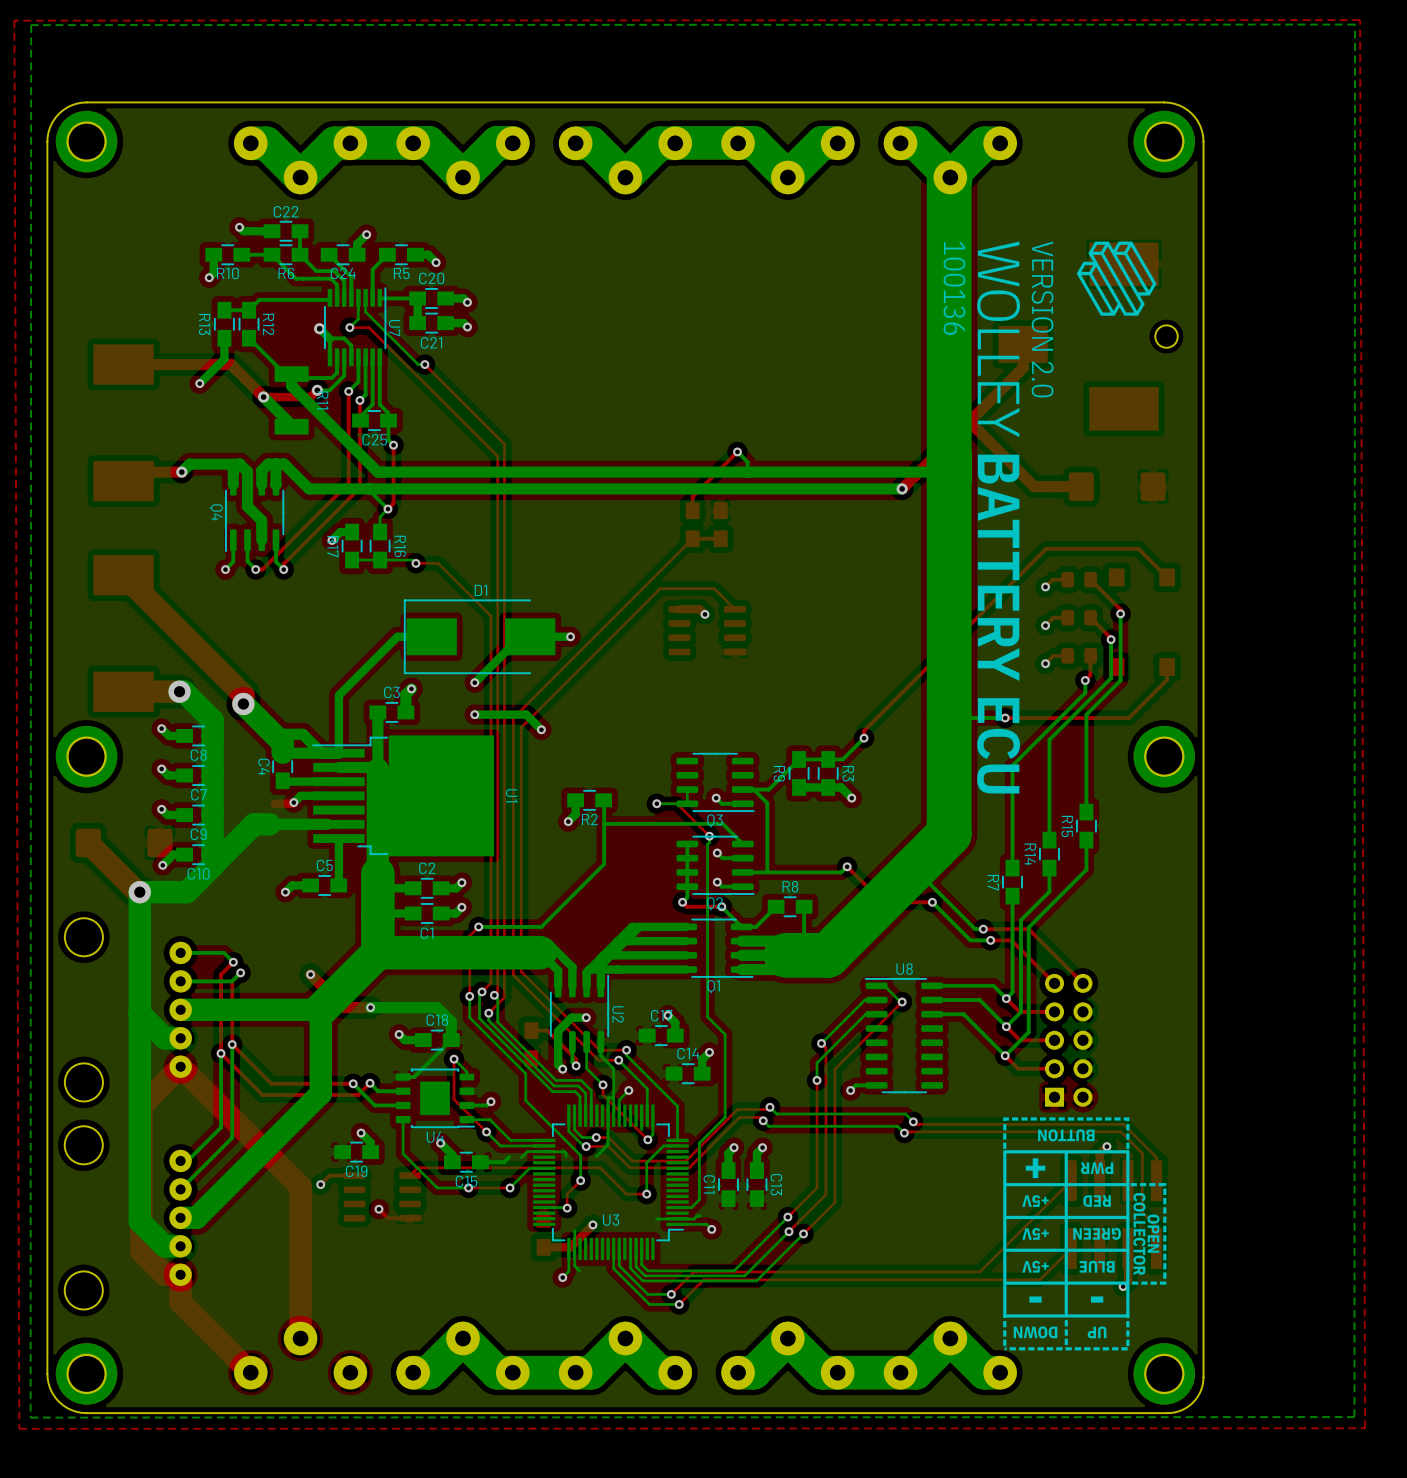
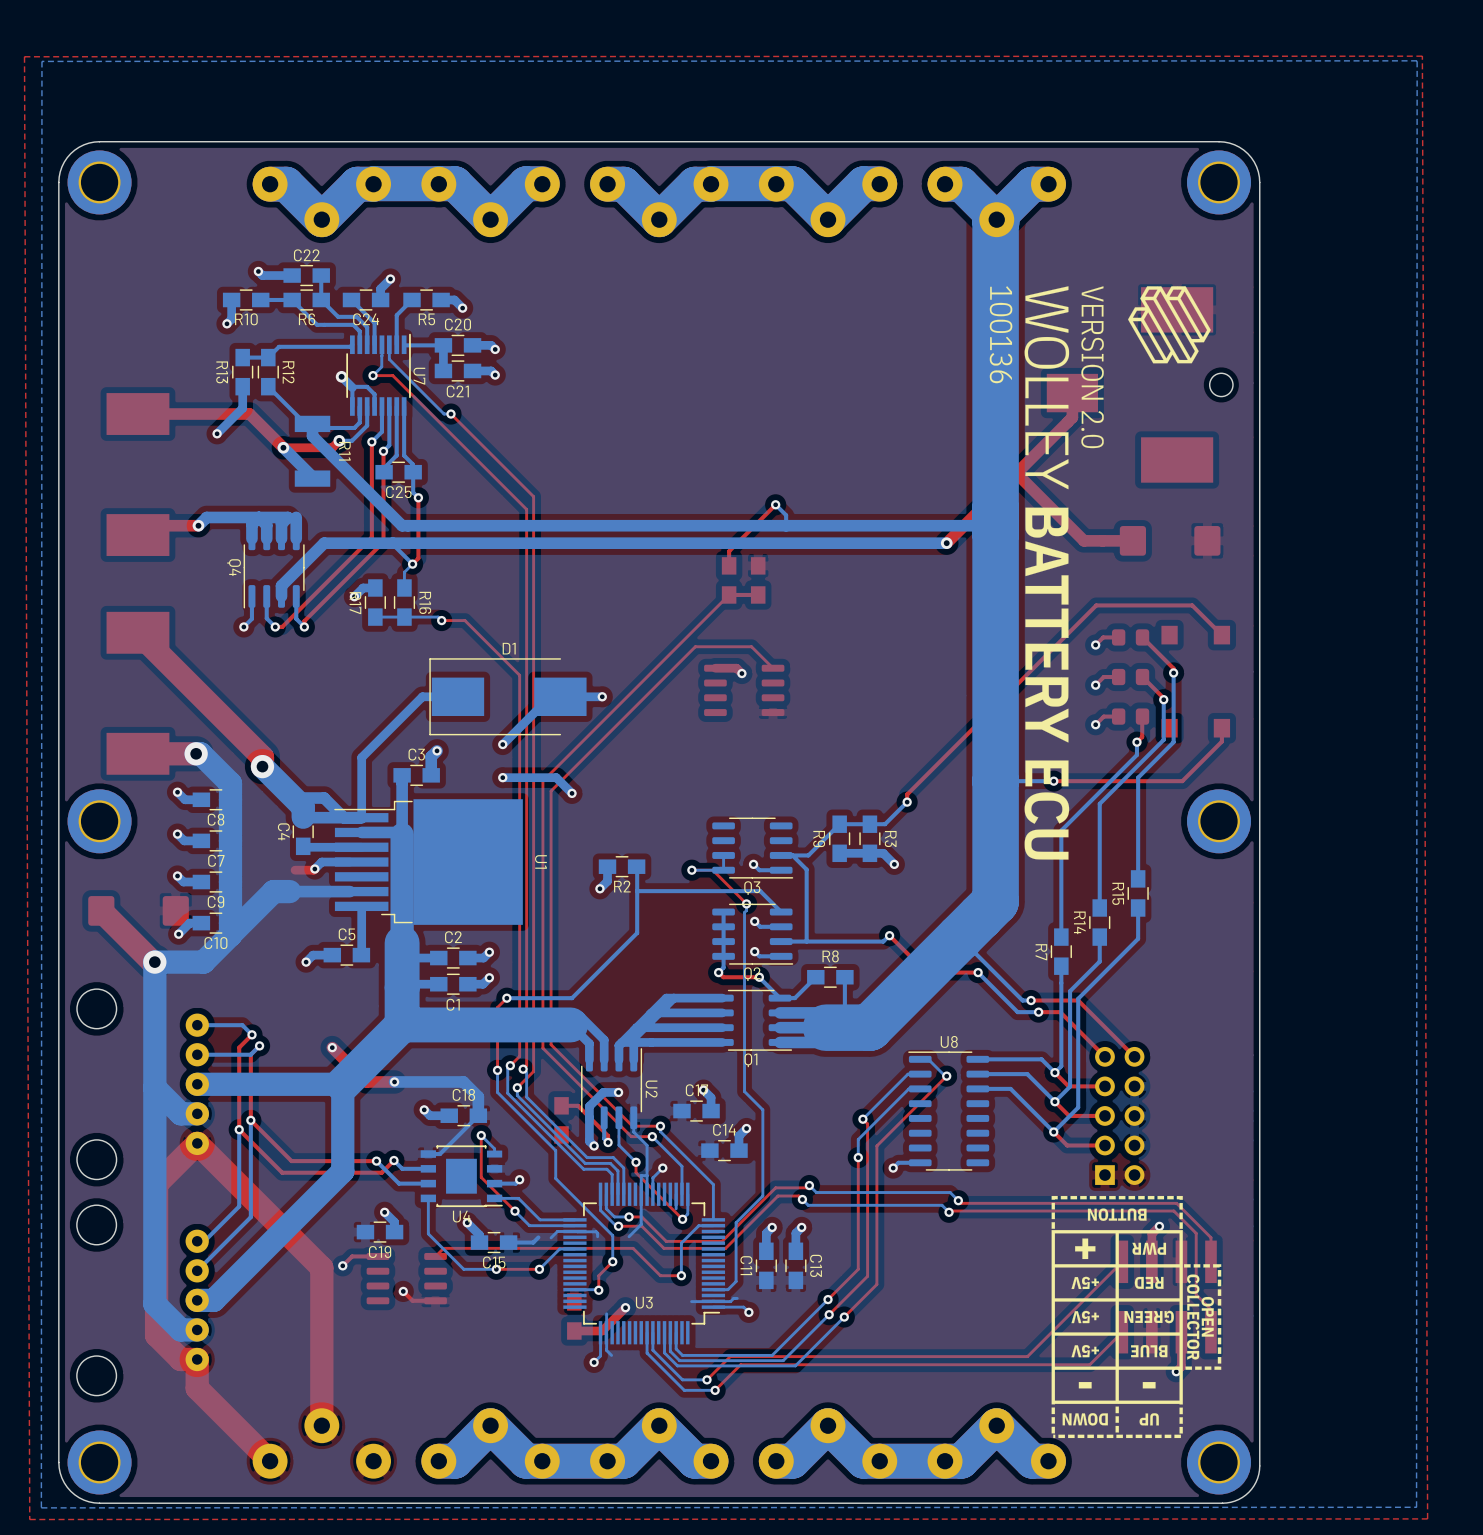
bottom track: none -> (258, 517) (287, 517) (281, 523)
bottom track: (261, 470) (268, 464) (284, 464) (309, 488) -> (281, 585) (324, 543) (330, 543)
bottom track: (247, 484) (247, 506) (261, 520) (261, 530) -> none

